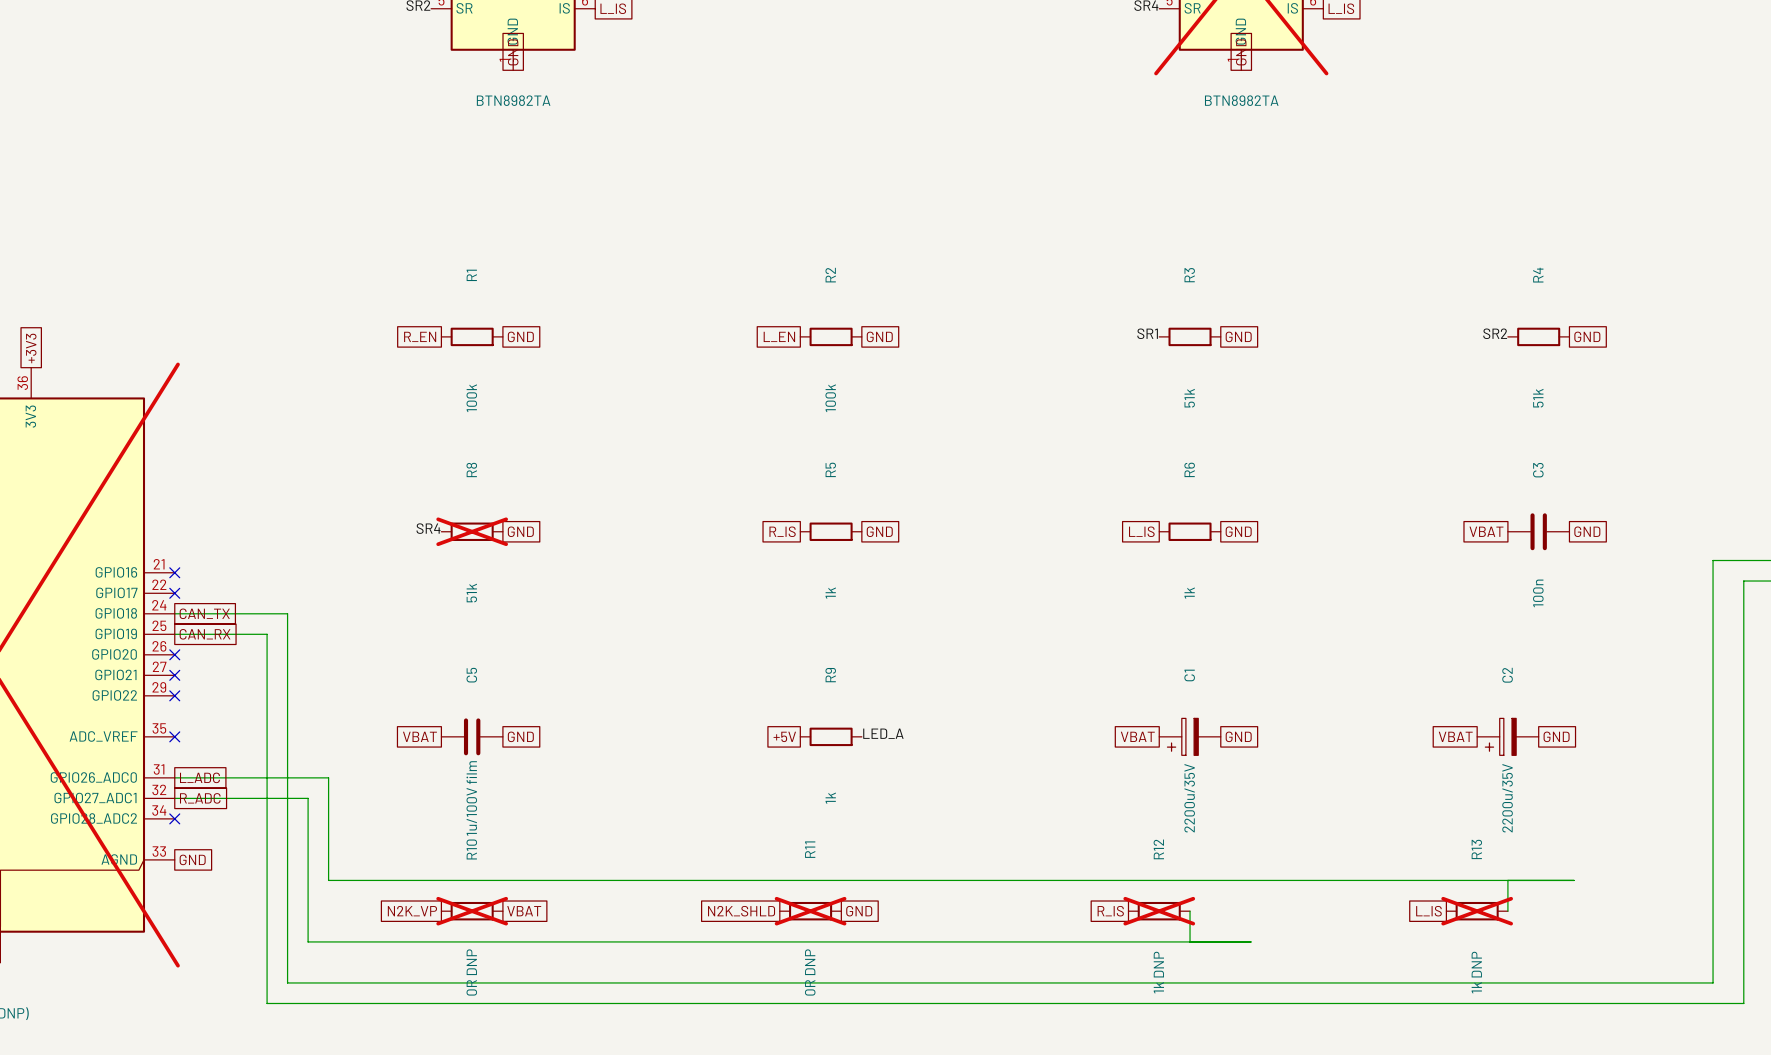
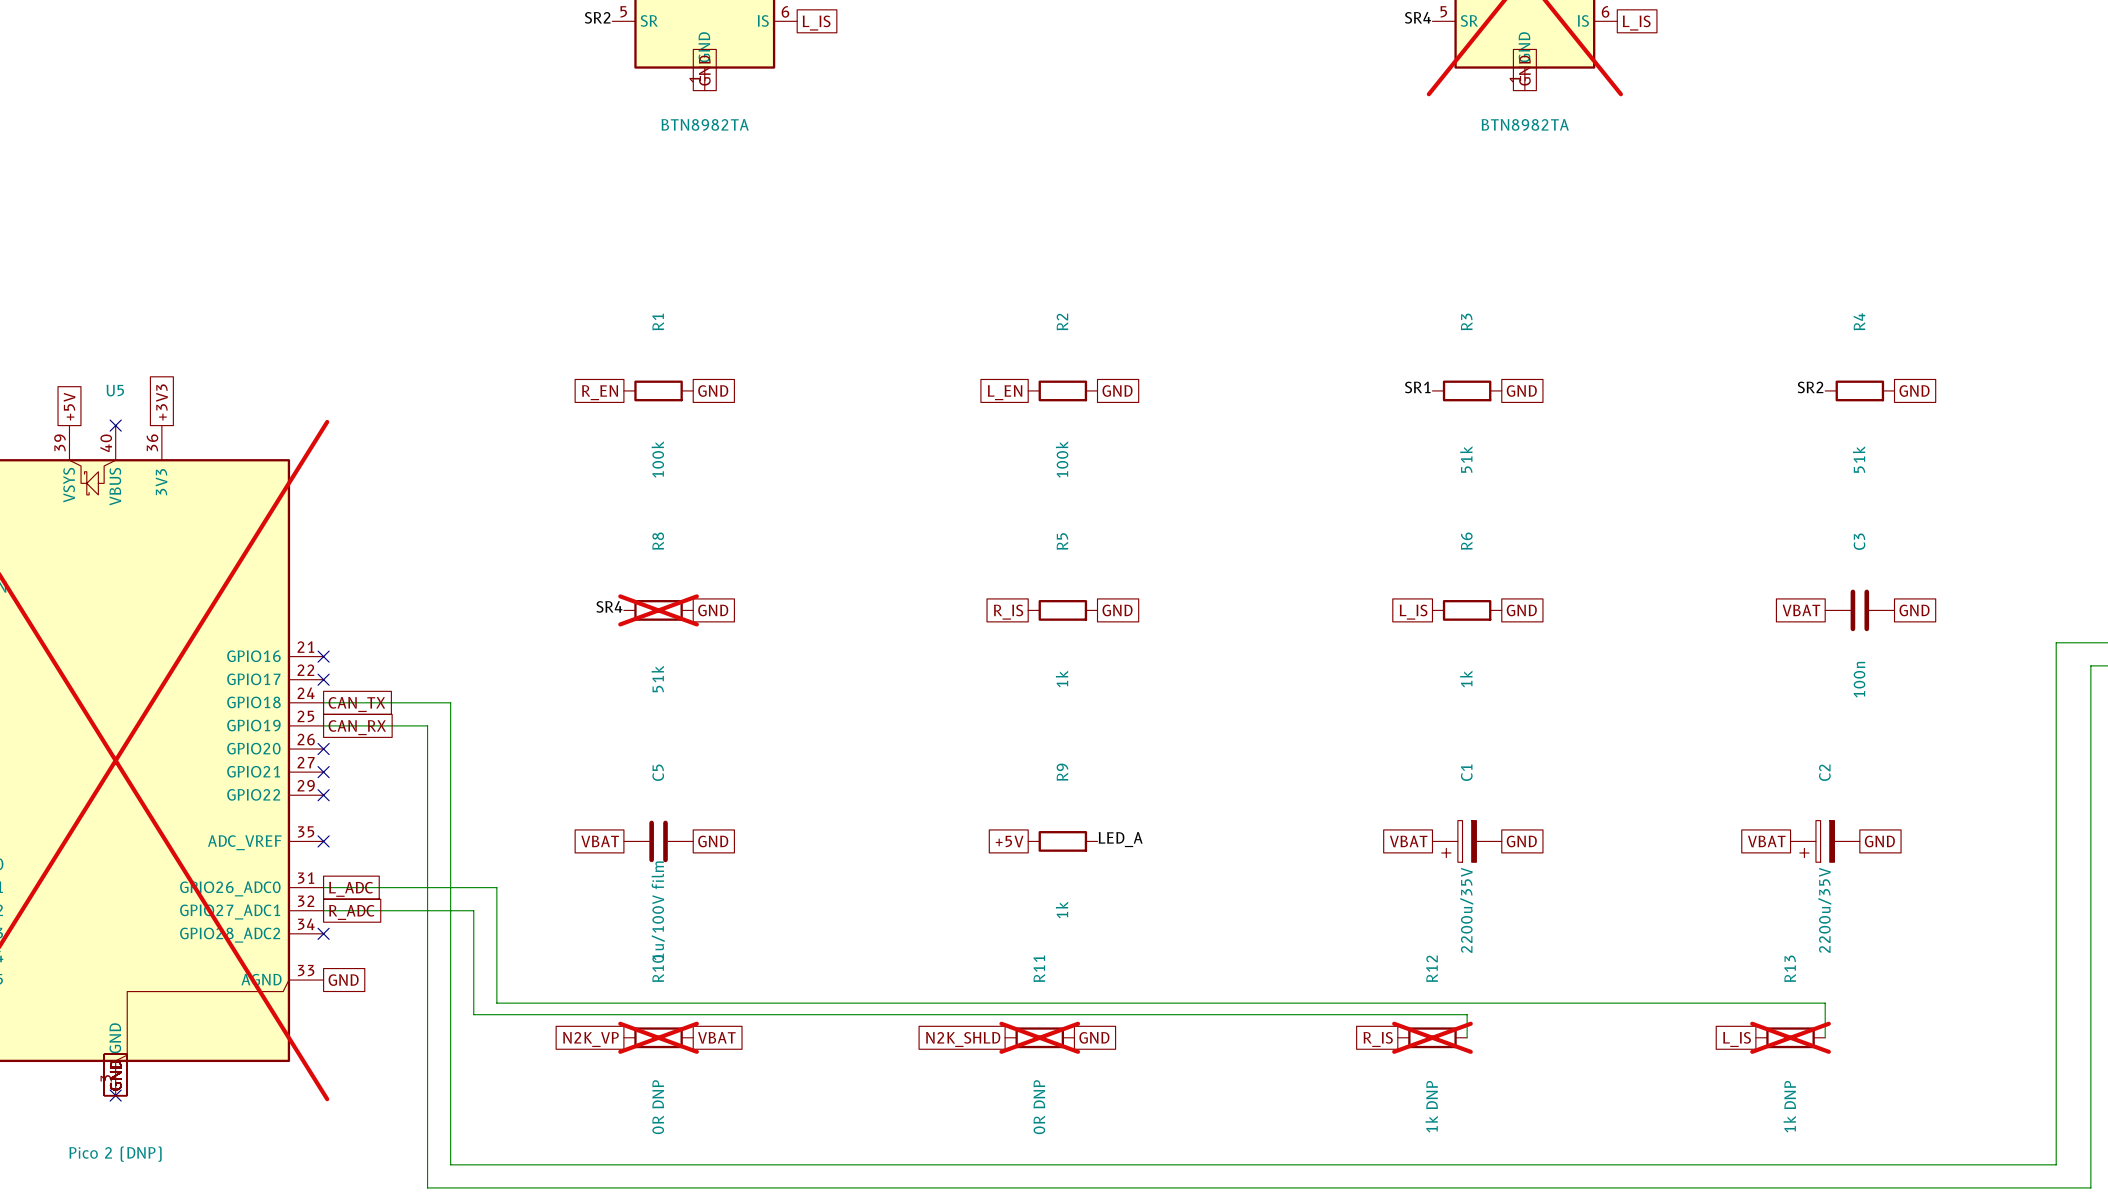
wire: (1507, 880) (1574, 880) -> none
wire: (308, 890) (308, 941) (1251, 941) -> (473, 1014) (1467, 1014) (1467, 1037)
wire: (1190, 911) (1190, 941) -> none
wire: (287, 982) (1713, 982) -> (450, 1118) (450, 1164) (2056, 1164) (2056, 1118)
wire: (267, 1003) (1743, 1003) -> (427, 1141) (427, 1187) (2090, 1187) (2090, 1141)

